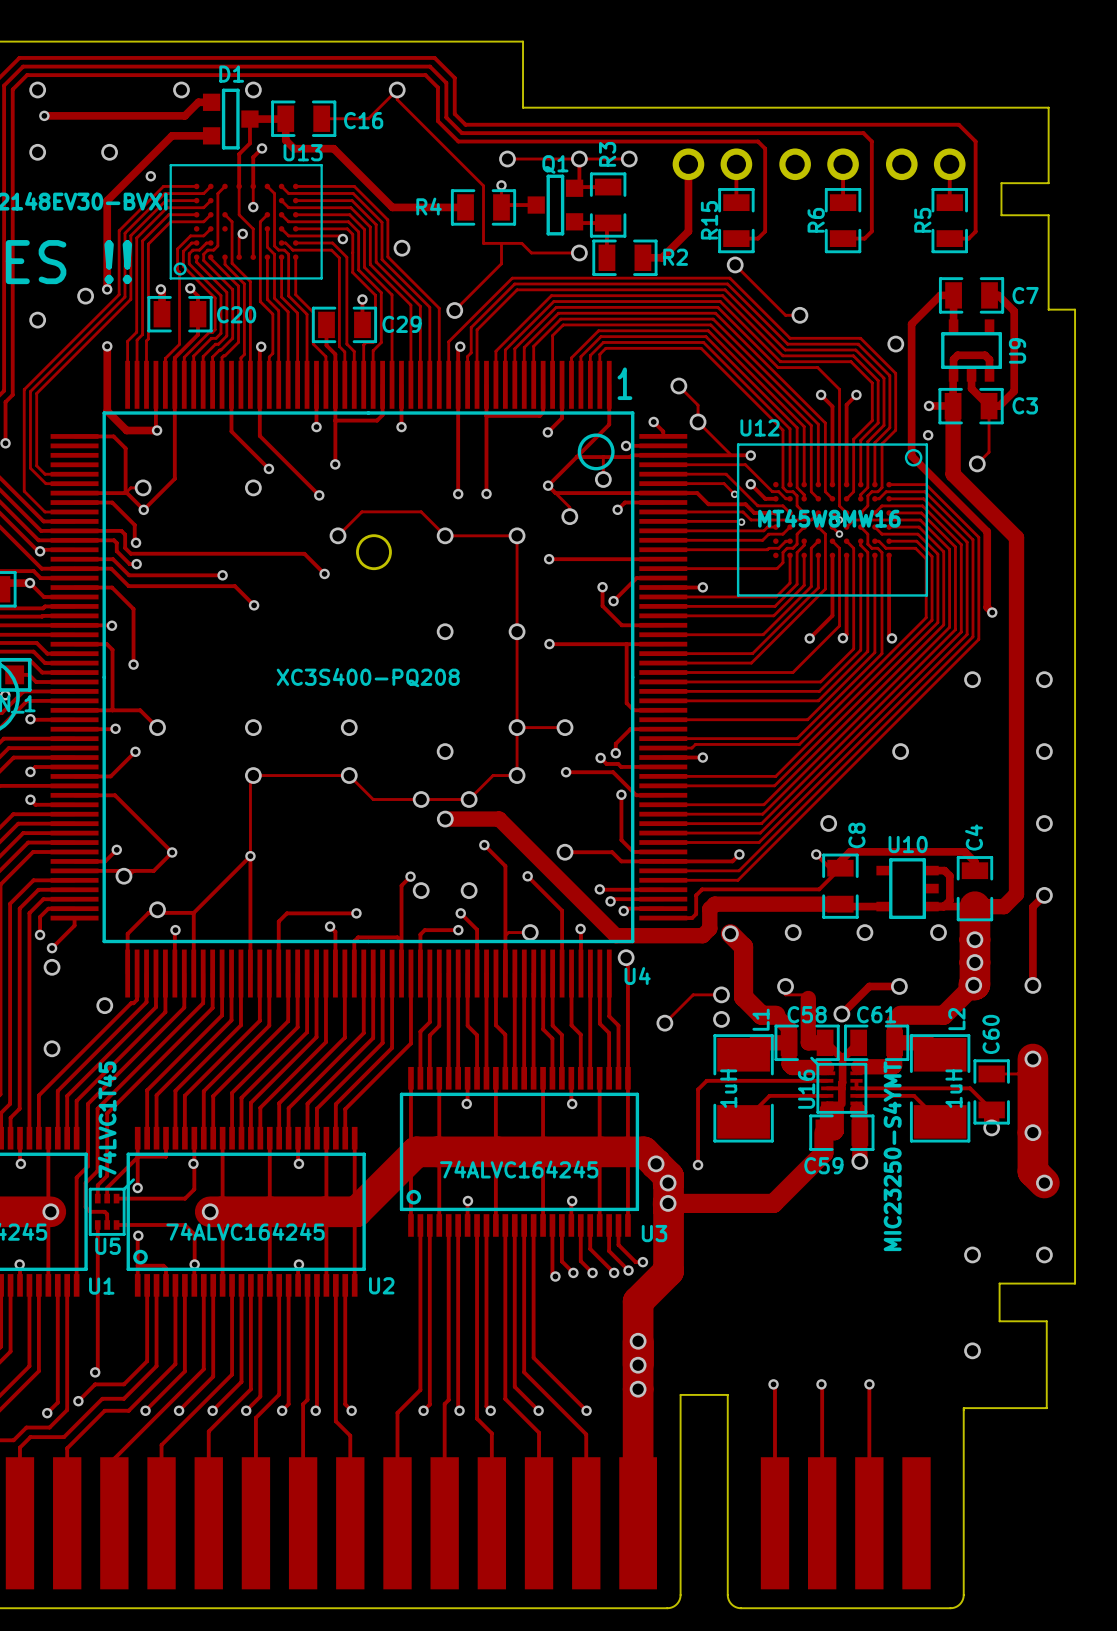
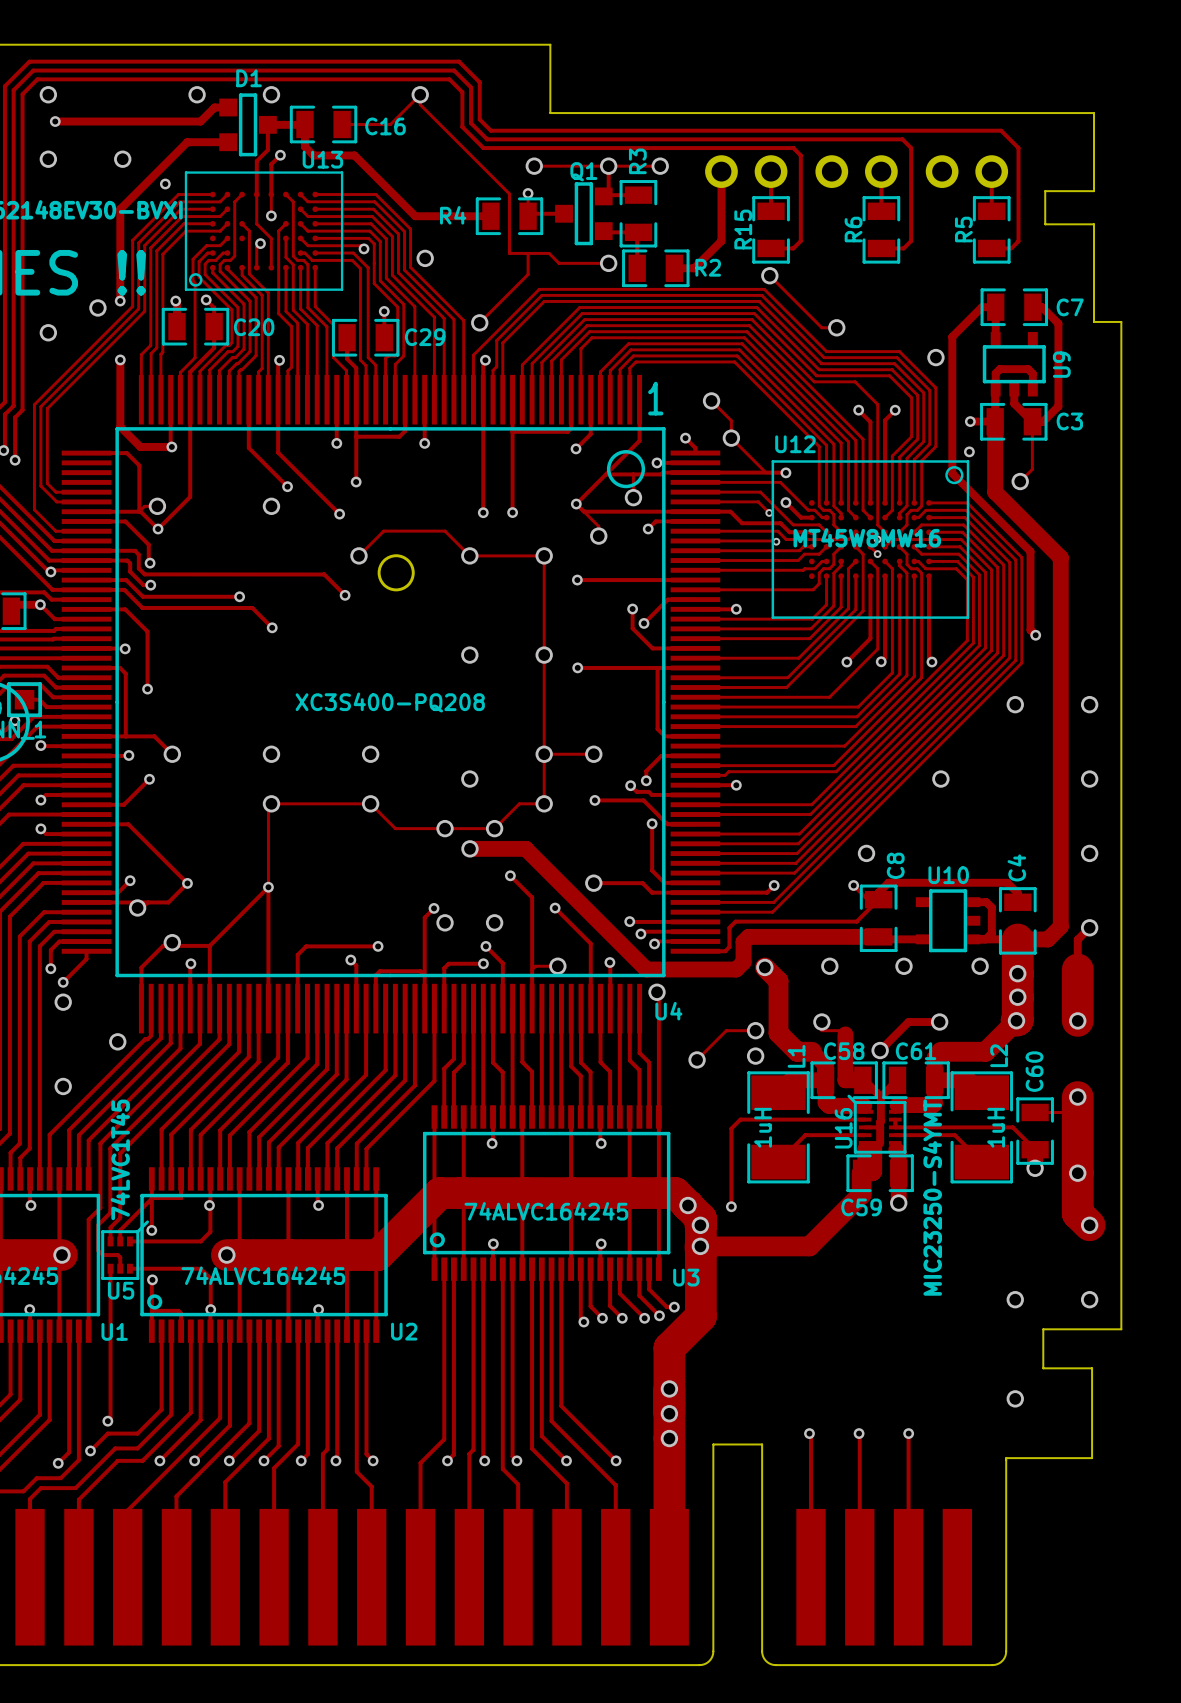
track width: thin (1032, 935) (1032, 985) -> thick (1077, 969) (1077, 1020)

